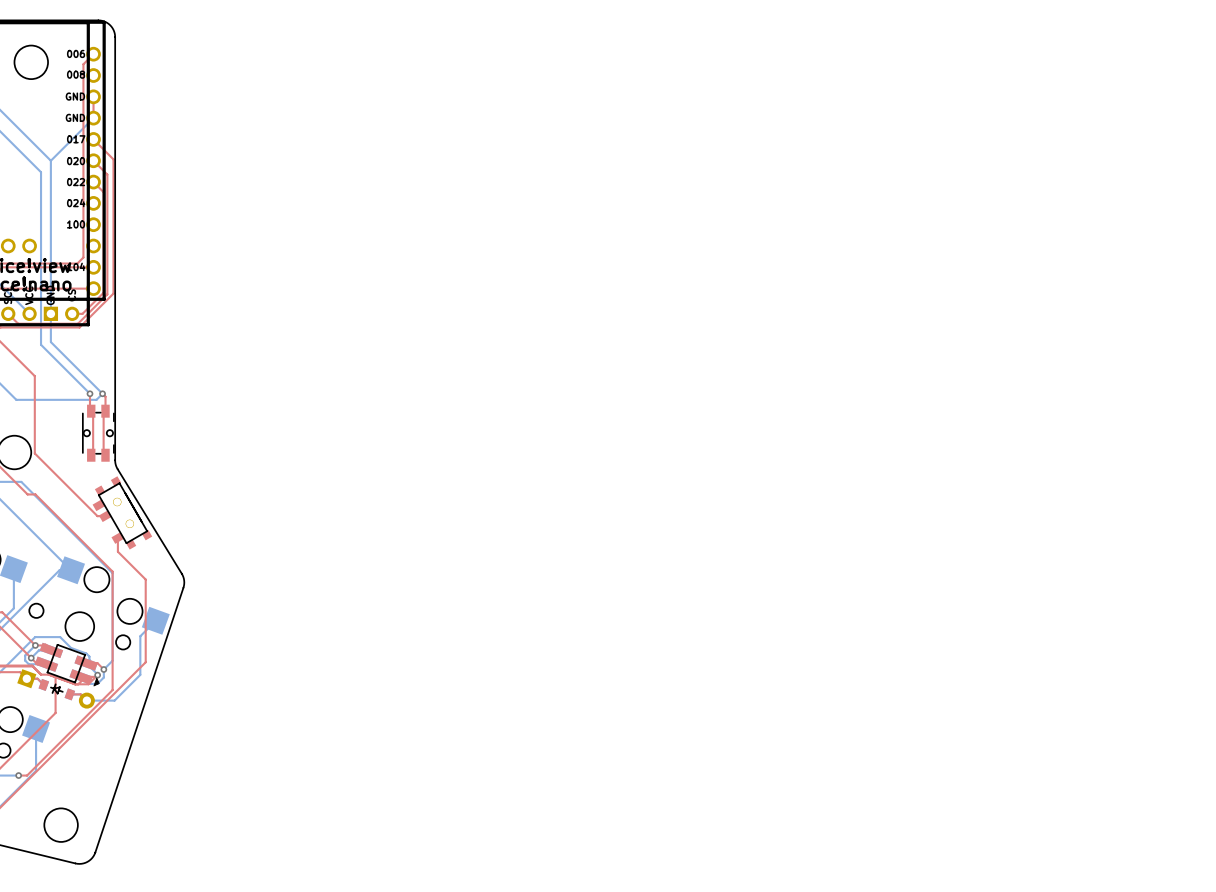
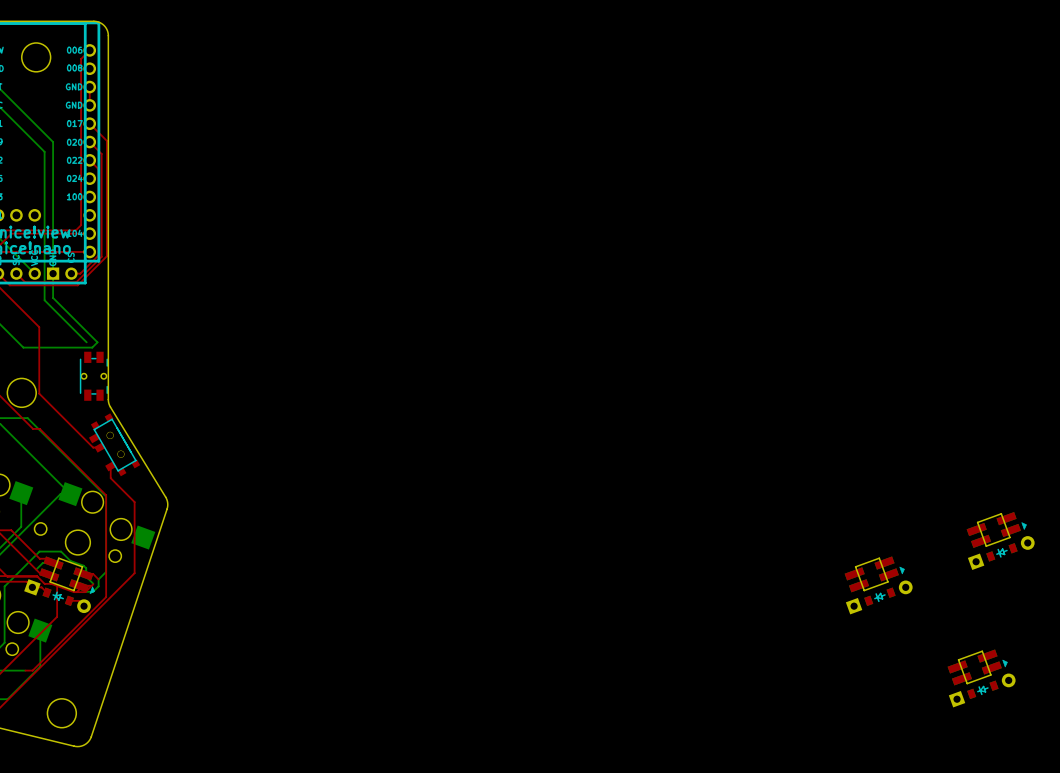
bottom track: (93, 118) (50, 160) -> none
top track: (89, 393) (89, 409) (93, 413) (93, 453) (91, 455) -> none
via: (89, 393) -> none
top track: (102, 393) (105, 396) (105, 411) (103, 413) (103, 453) (105, 455) -> none
via: (102, 393) -> none
part: none -> (996, 529)
bottom track: (155, 620) (140, 636) (140, 674) (114, 700) (86, 700) (80, 694) (69, 694) -> none
part: none -> (1001, 553)
bottom track: (35, 645) (25, 655) (25, 660) (28, 664) (46, 664) (42, 659) -> none
via: (35, 645) -> none
via: (31, 658) -> none
part: none -> (874, 574)
via: (103, 669) -> none
via: (97, 675) -> none
part: none -> (879, 597)
part: none -> (977, 667)
via: (18, 775) -> none
part: none -> (982, 690)

